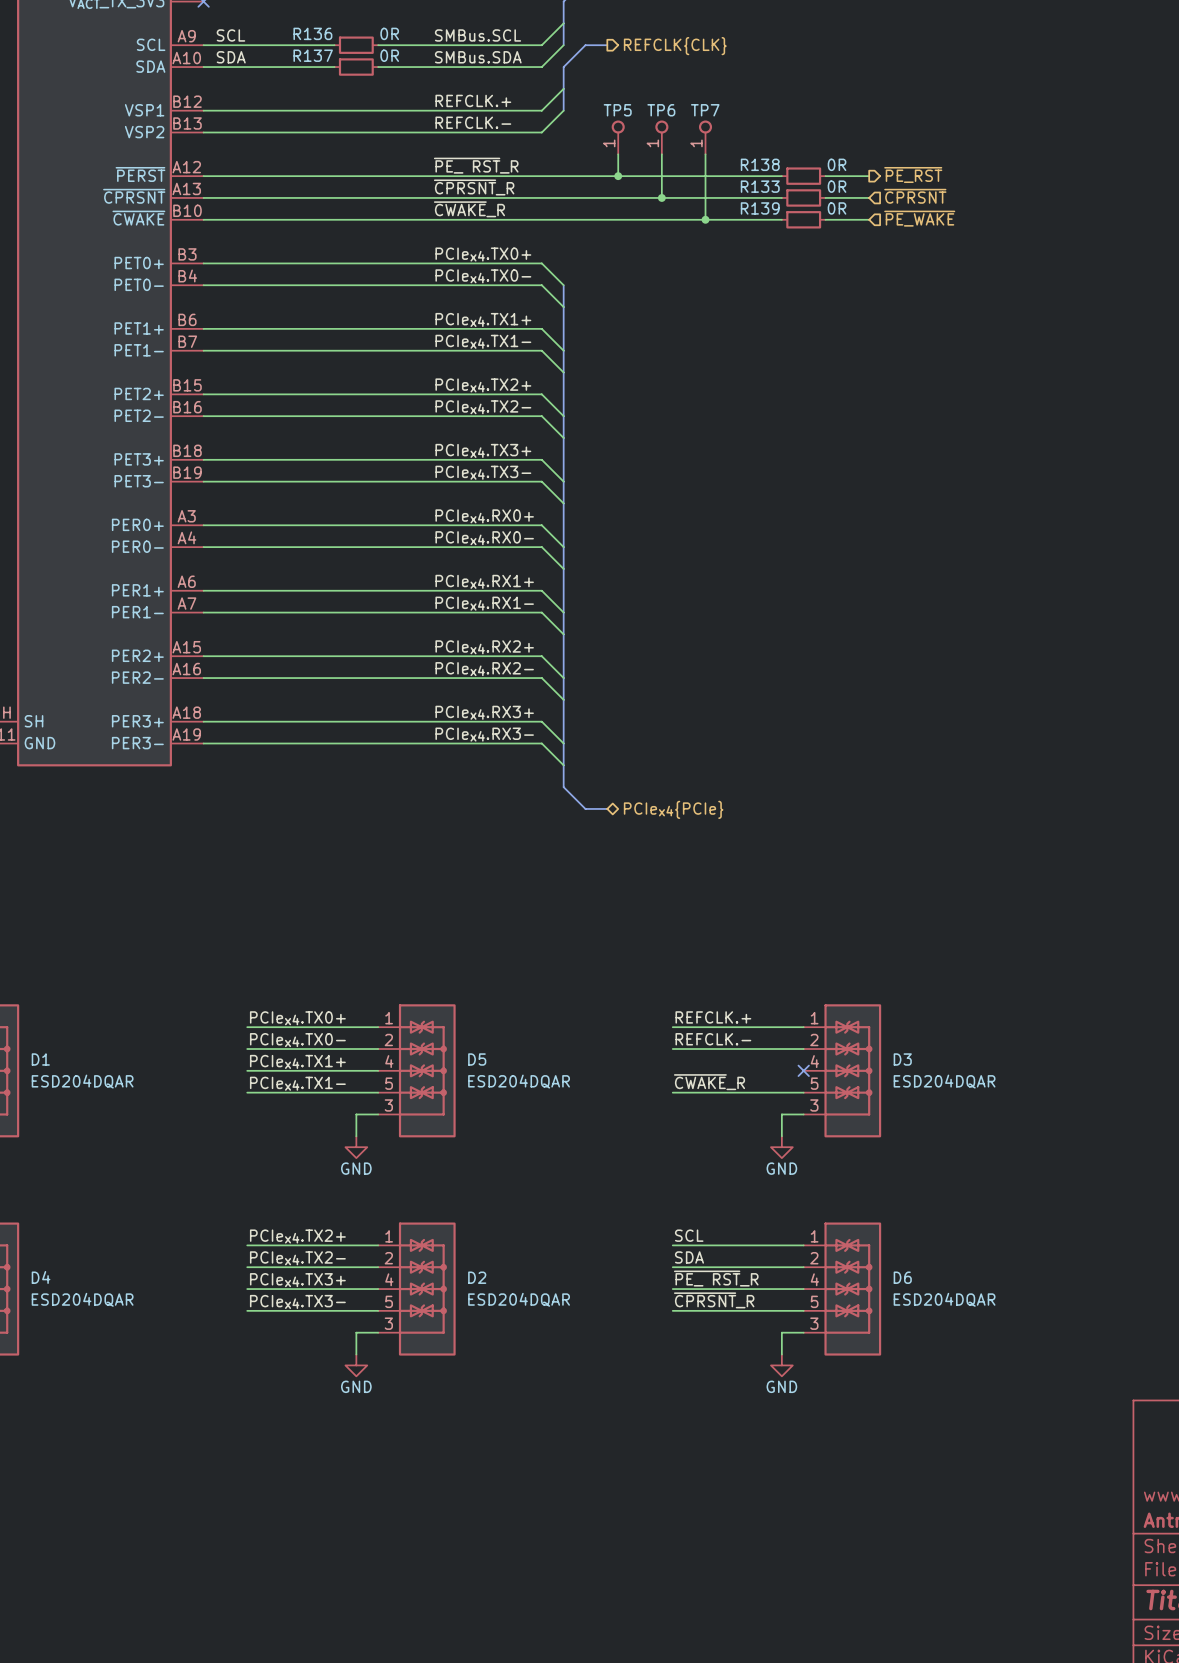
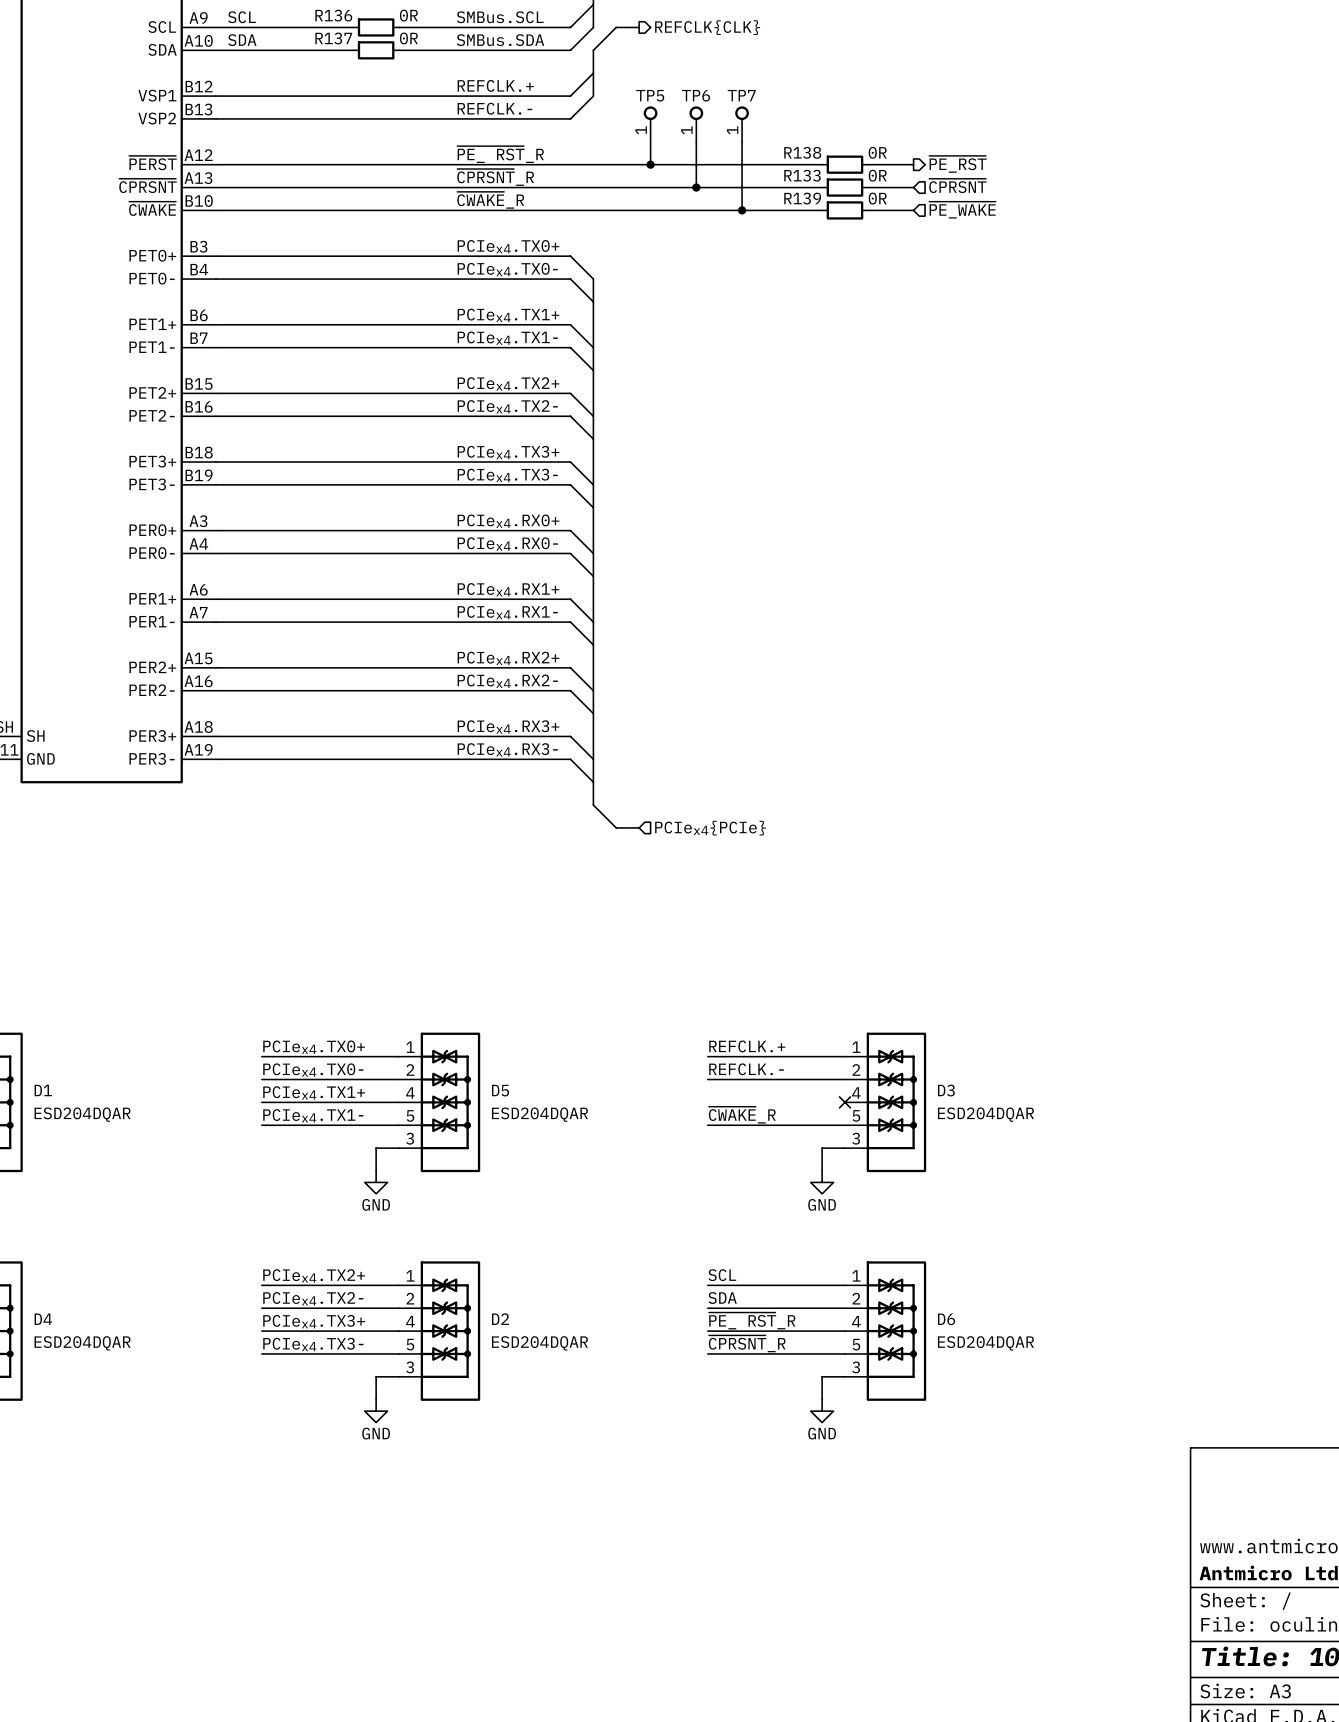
hierarchical label shape: bidirectional (673, 809) -> input (710, 828)

